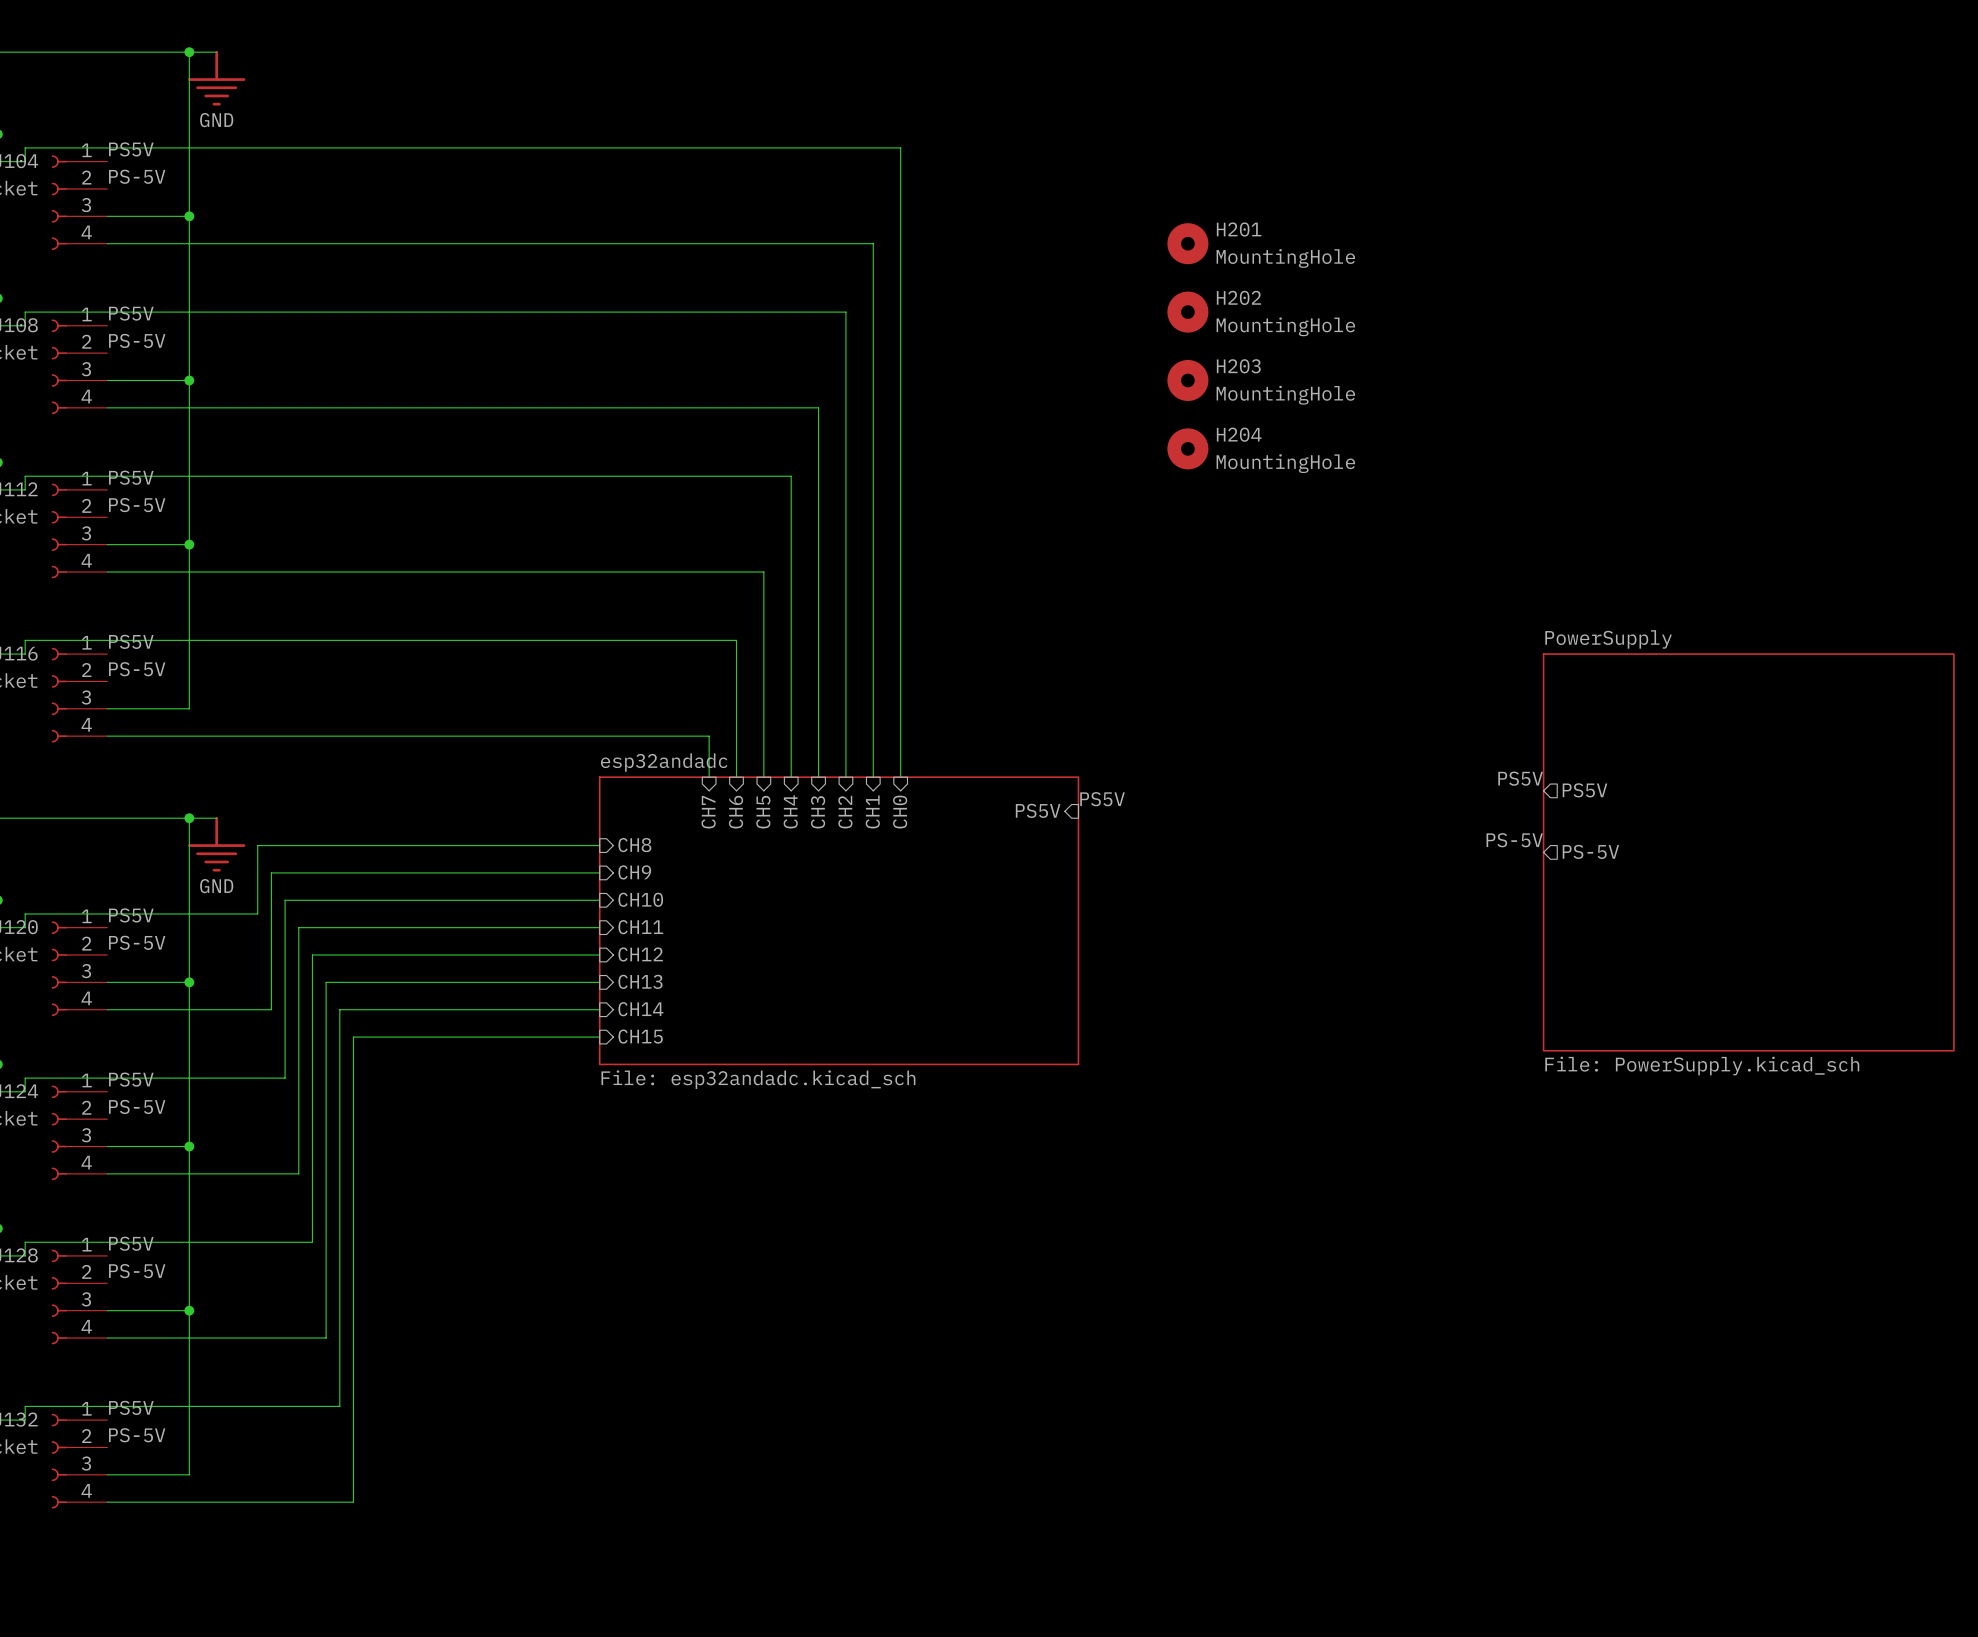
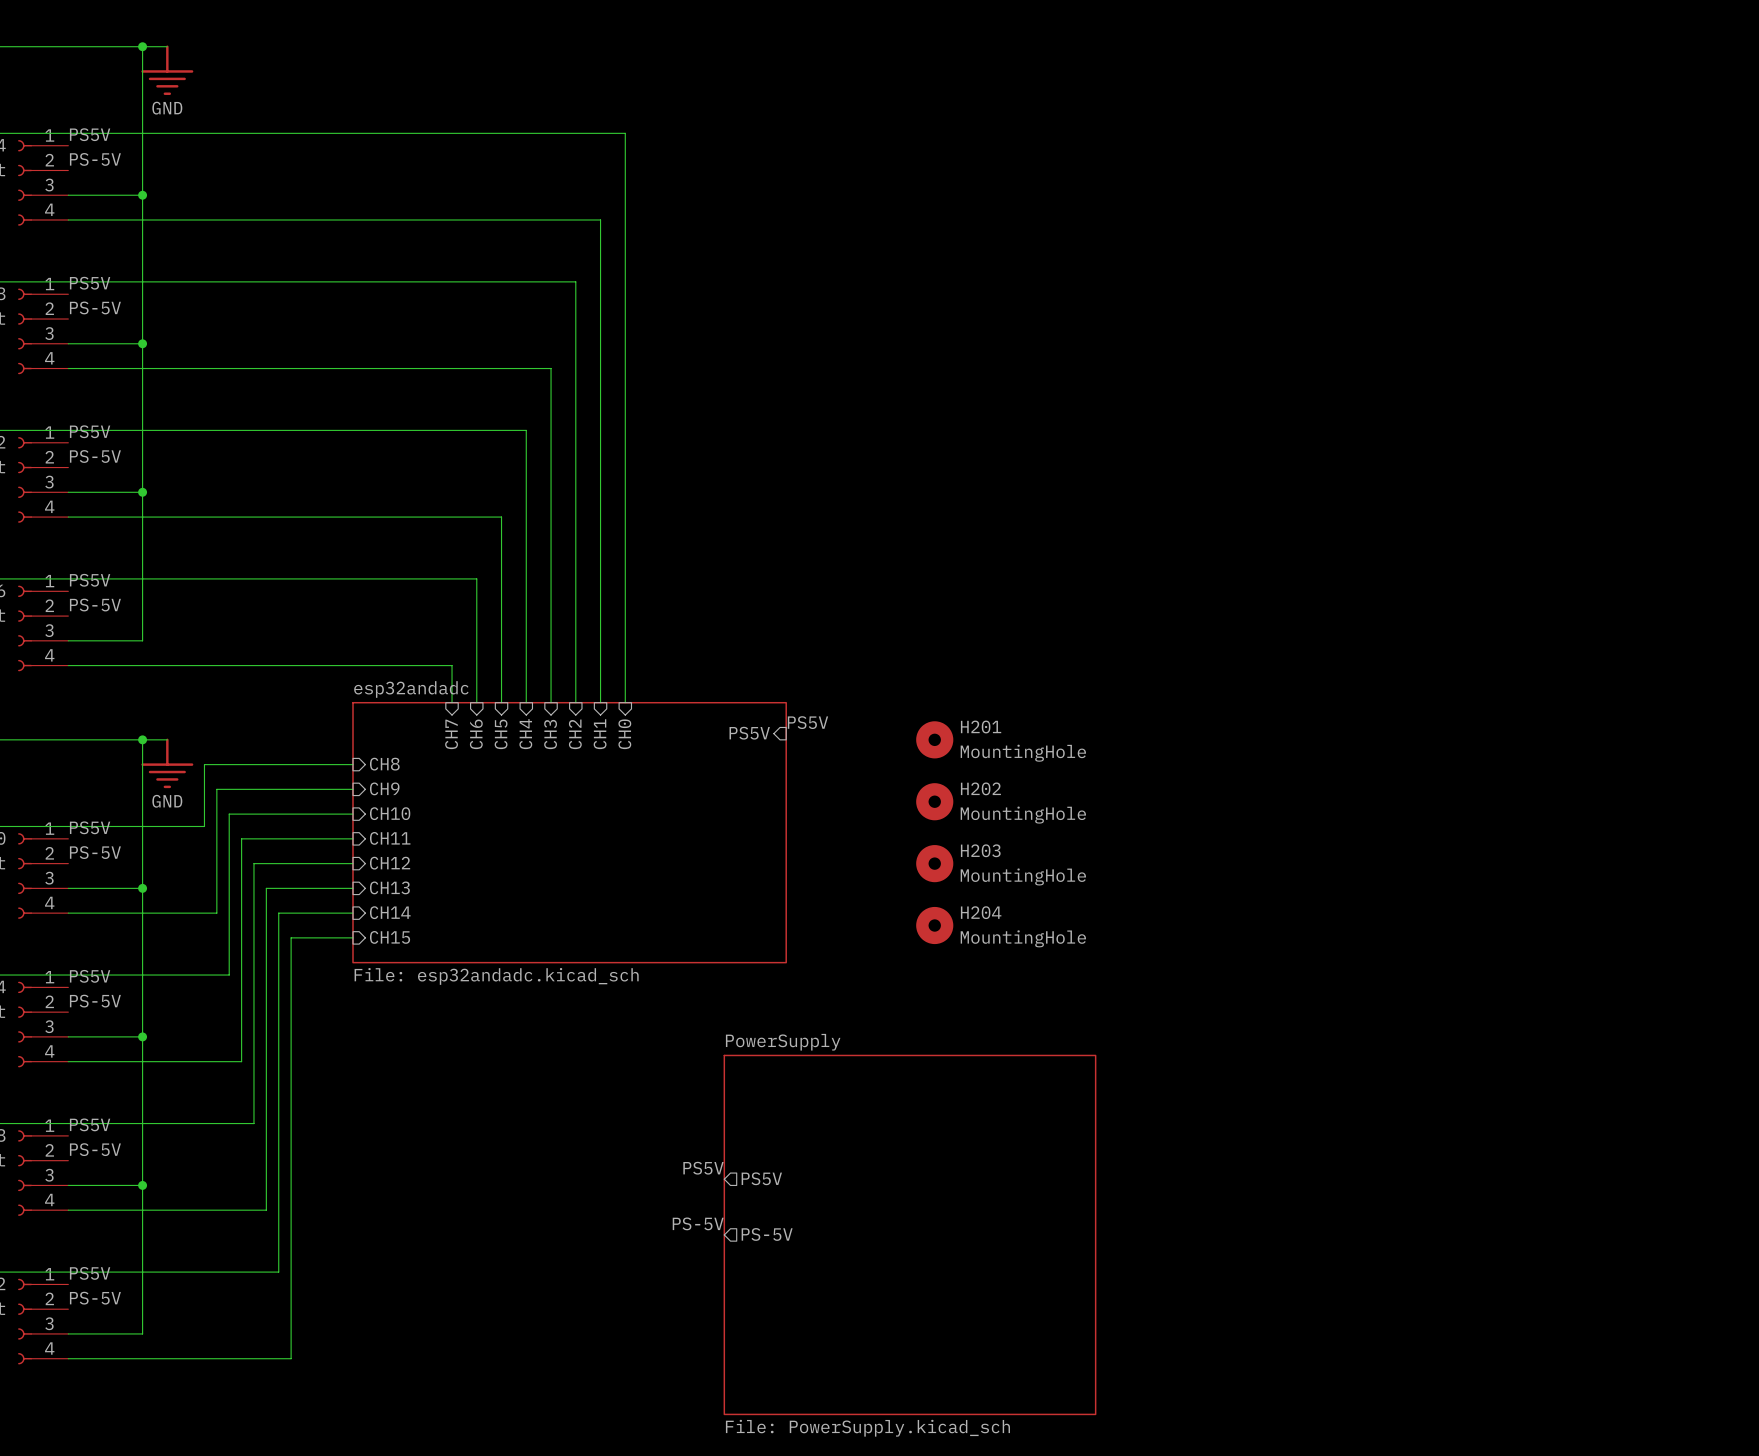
wire: (722, 147) (900, 147) (900, 777) -> (625, 133) (625, 702)
wire: (695, 243) (873, 243) (873, 777) -> (600, 219) (600, 702)
H201 position: (1187, 243) -> (934, 739)
wire: (668, 312) (845, 312) (845, 777) -> (575, 281) (575, 702)
H202 position: (1187, 312) -> (934, 801)
H203 position: (1187, 380) -> (934, 863)
wire: (640, 407) (818, 407) (818, 777) -> (551, 368) (551, 702)
H204 position: (1187, 448) -> (934, 925)
wire: (613, 476) (791, 476) (791, 777) -> (526, 430) (526, 702)
wire: (586, 571) (763, 571) (763, 777) -> (501, 517) (501, 702)
wire: (558, 640) (736, 640) (736, 777) -> (476, 578) (476, 702)
wire: (531, 736) (709, 736) (709, 777) -> (452, 665) (452, 702)
label: PS5V (1520, 778) -> none
sheet pin: PS5V (1584, 790) -> none
label position: PS5V (1102, 799) -> PS5V (807, 722)
sheet pin position: PS5V (1038, 810) -> PS5V (749, 733)
sheet pin position: CH4 (790, 811) -> CH4 (525, 734)
sheet pin position: CH1 (872, 811) -> CH1 (600, 734)
sheet pin position: CH7 (708, 812) -> CH7 (451, 734)
sheet pin position: CH6 (735, 812) -> CH6 (476, 734)
sheet pin position: CH5 (763, 812) -> CH5 (501, 734)
sheet pin position: CH3 (818, 812) -> CH3 (550, 734)
sheet pin position: CH2 (845, 812) -> CH2 (575, 734)
sheet pin position: CH0 (900, 812) -> CH0 (624, 734)
label: PS-5V (1514, 840) -> none
wire: (421, 845) (599, 845) -> none
sheet pin position: CH8 (634, 845) -> CH8 (384, 764)
sheet pin: PS-5V (1590, 851) -> none
sheet PowerSupply: File: PowerSupply.kicad_sch (1748, 852) -> none
wire: (421, 872) (599, 872) -> none
sheet pin position: CH9 (634, 872) -> CH9 (384, 788)
sheet pin position: CH10 (640, 899) -> CH10 (390, 813)
wire: (421, 900) (599, 900) -> none
sheet esp32andadc position: (839, 920) -> (569, 832)
wire: (421, 927) (599, 927) -> none
sheet pin position: CH11 (640, 927) -> CH11 (390, 838)
sheet pin position: CH12 (640, 954) -> CH12 (390, 863)
wire: (421, 955) (599, 955) -> none
sheet pin position: CH13 (640, 981) -> CH13 (389, 887)
wire: (421, 982) (599, 982) -> none
wire: (421, 1009) (599, 1009) -> none
sheet pin position: CH14 (640, 1009) -> CH14 (390, 912)
sheet pin position: CH15 (640, 1036) -> CH15 (390, 937)
wire: (421, 1037) (599, 1037) -> none
label: none -> PS5V (703, 1168)
sheet pin: none -> PS5V (761, 1178)
label: none -> PS-5V (698, 1223)
sheet pin: none -> PS-5V (767, 1234)
sheet PowerSupply: none -> File: PowerSupply.kicad_sch (909, 1234)

